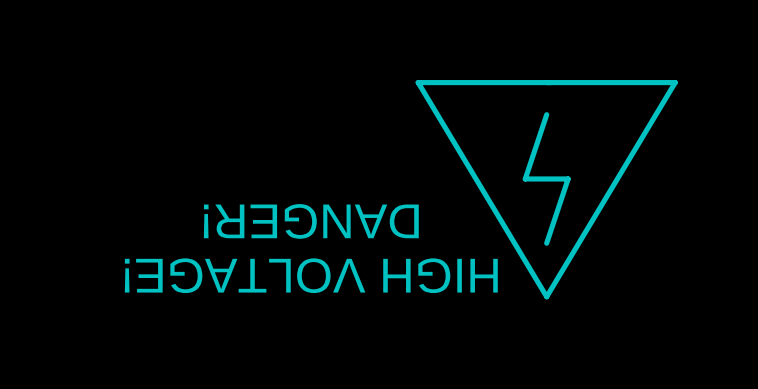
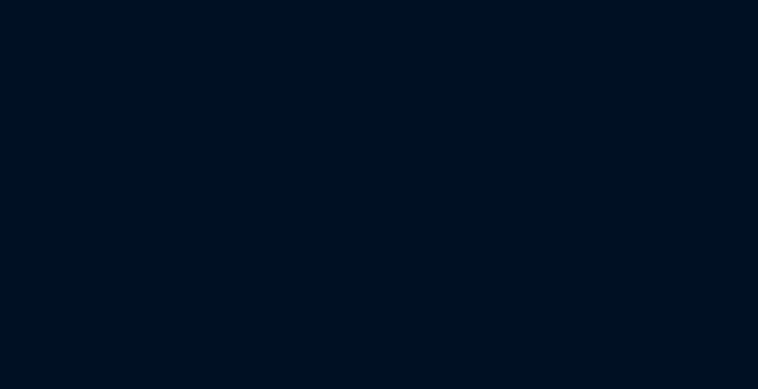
line: (675, 82) (546, 296) (418, 82) (675, 82) -> none
line: (546, 114) (525, 178) (568, 178) (546, 243) -> none
text: DANGER! (311, 221) -> none
text: HIGH VOLTAGE! (311, 275) -> none

